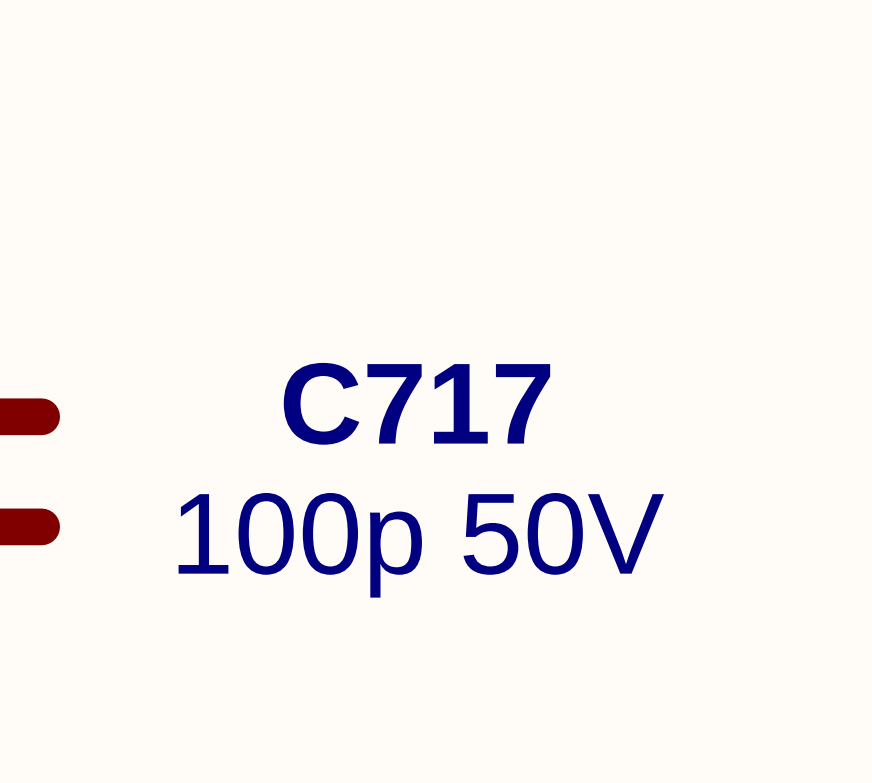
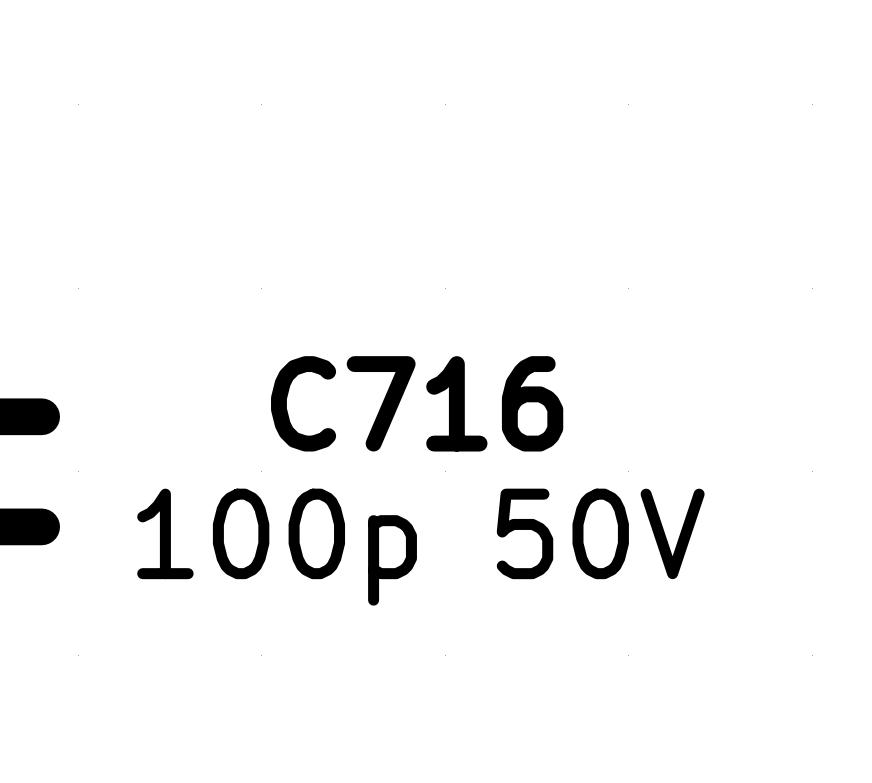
C717 name: C717 (416, 403) -> C716 (417, 403)

